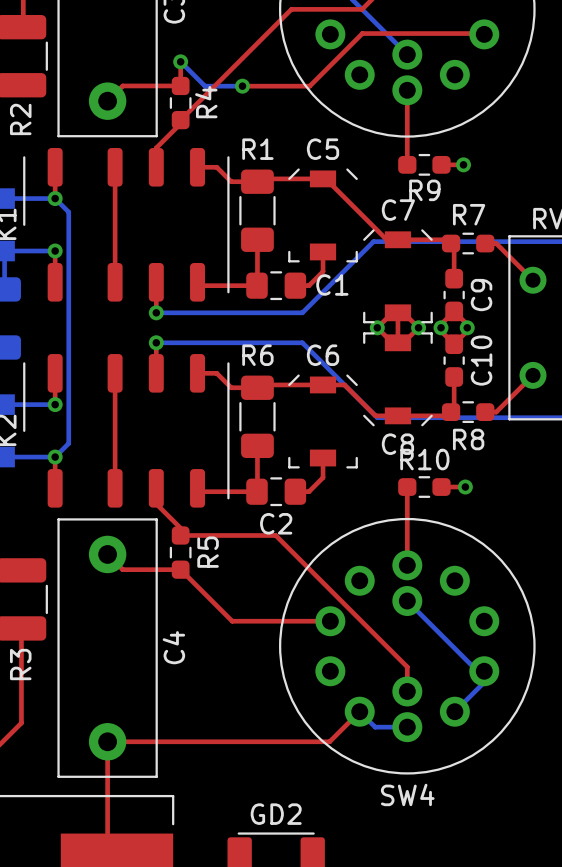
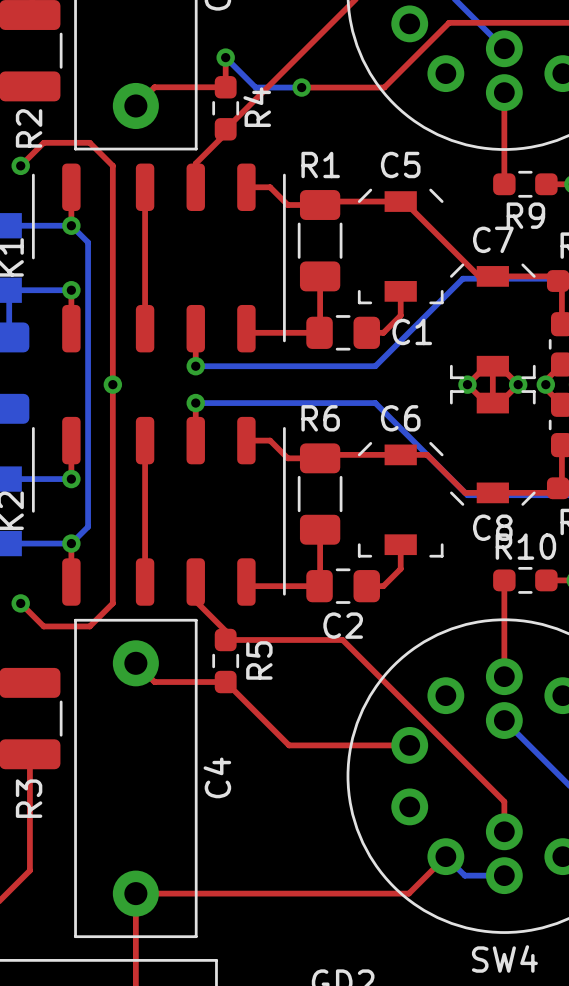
top track: none -> (20, 165) (43, 142) (89, 142) (112, 165) (112, 603) (89, 626) (43, 626) (20, 603)
via: none -> (20, 165)
via: none -> (112, 384)
via: none -> (20, 603)

